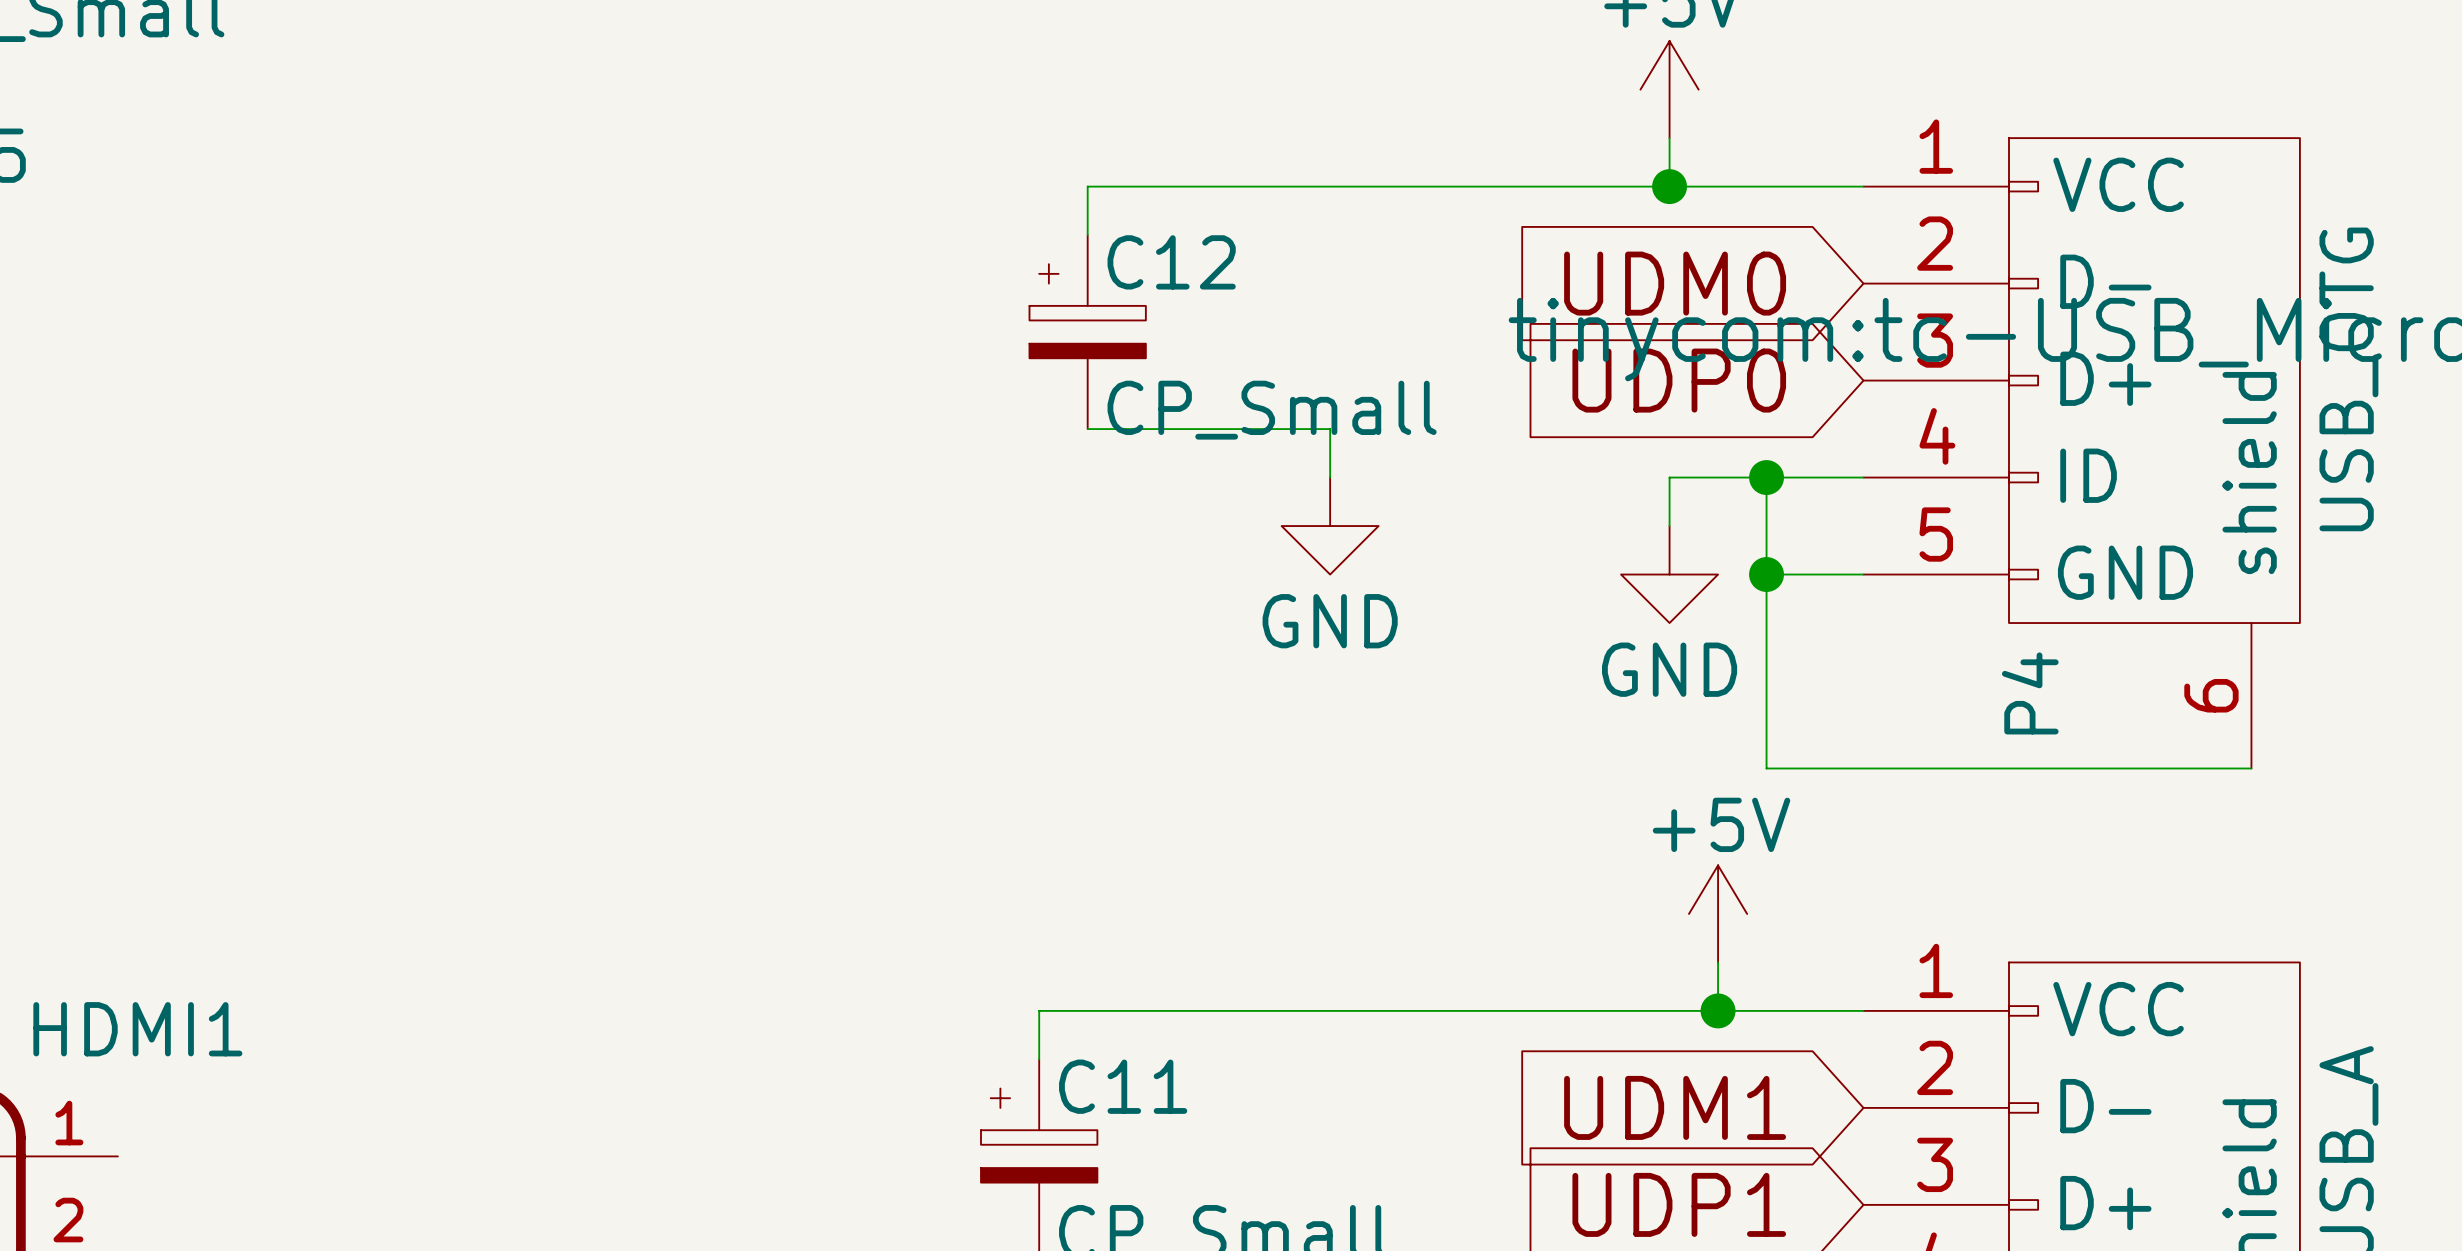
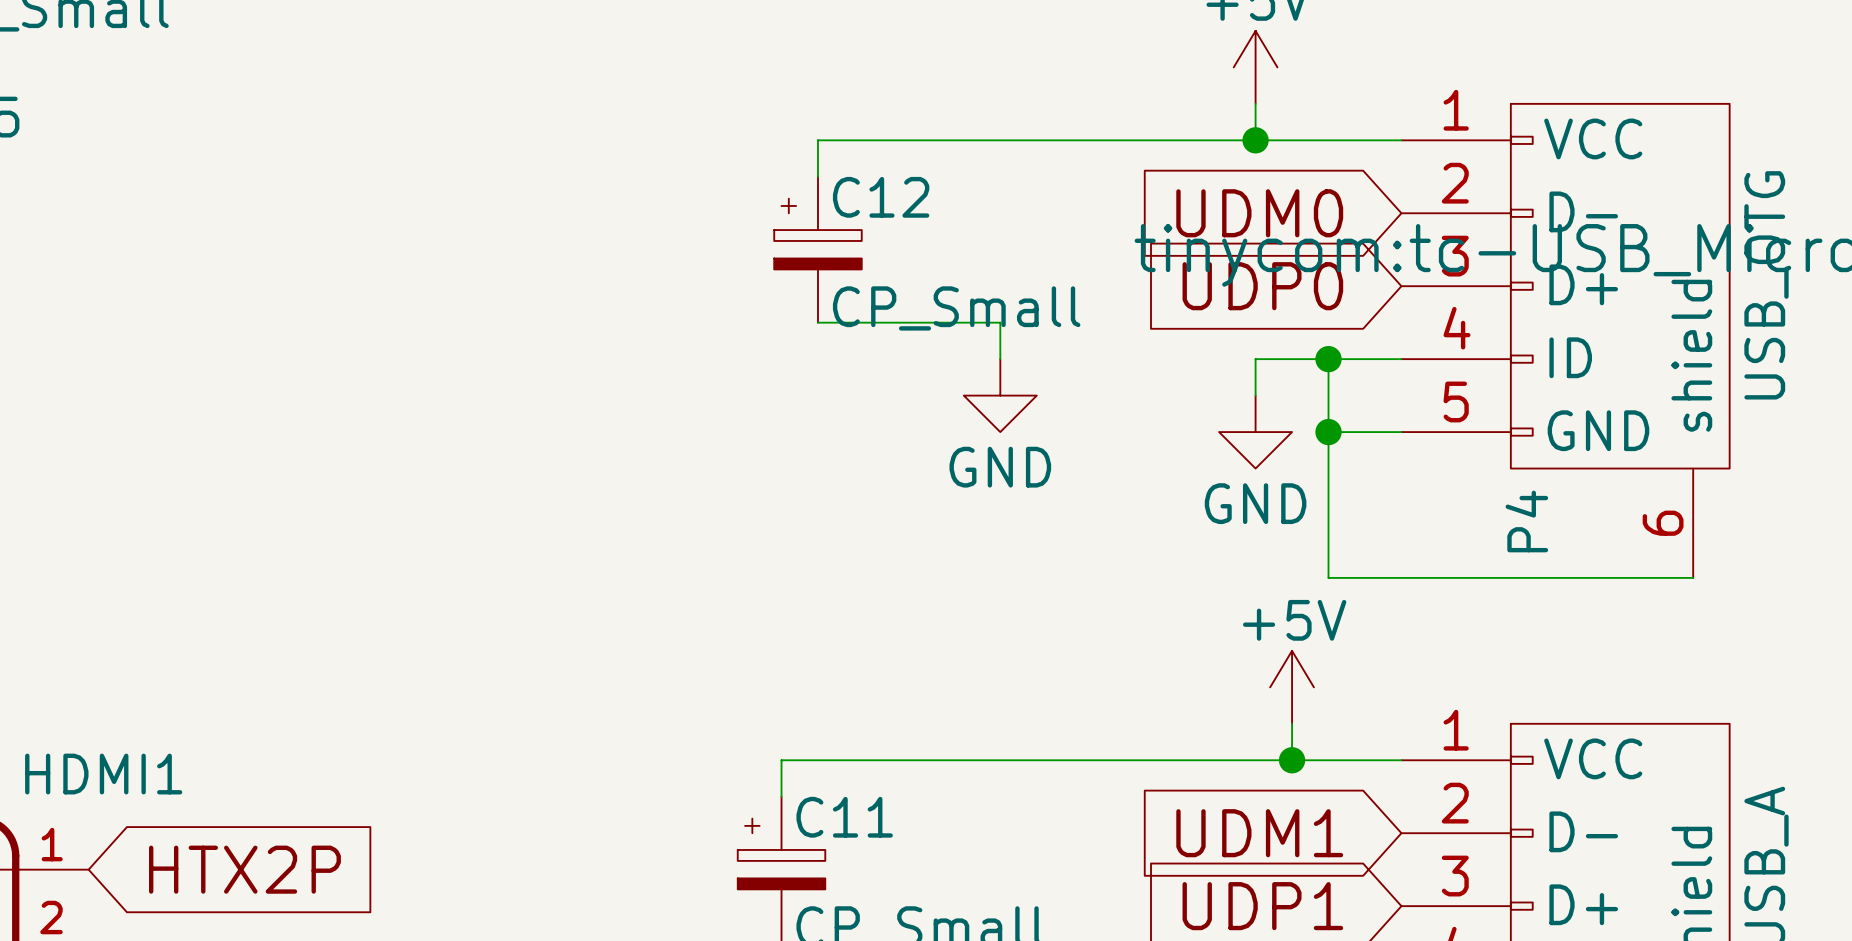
global label: none -> HTX2P (244, 869)

